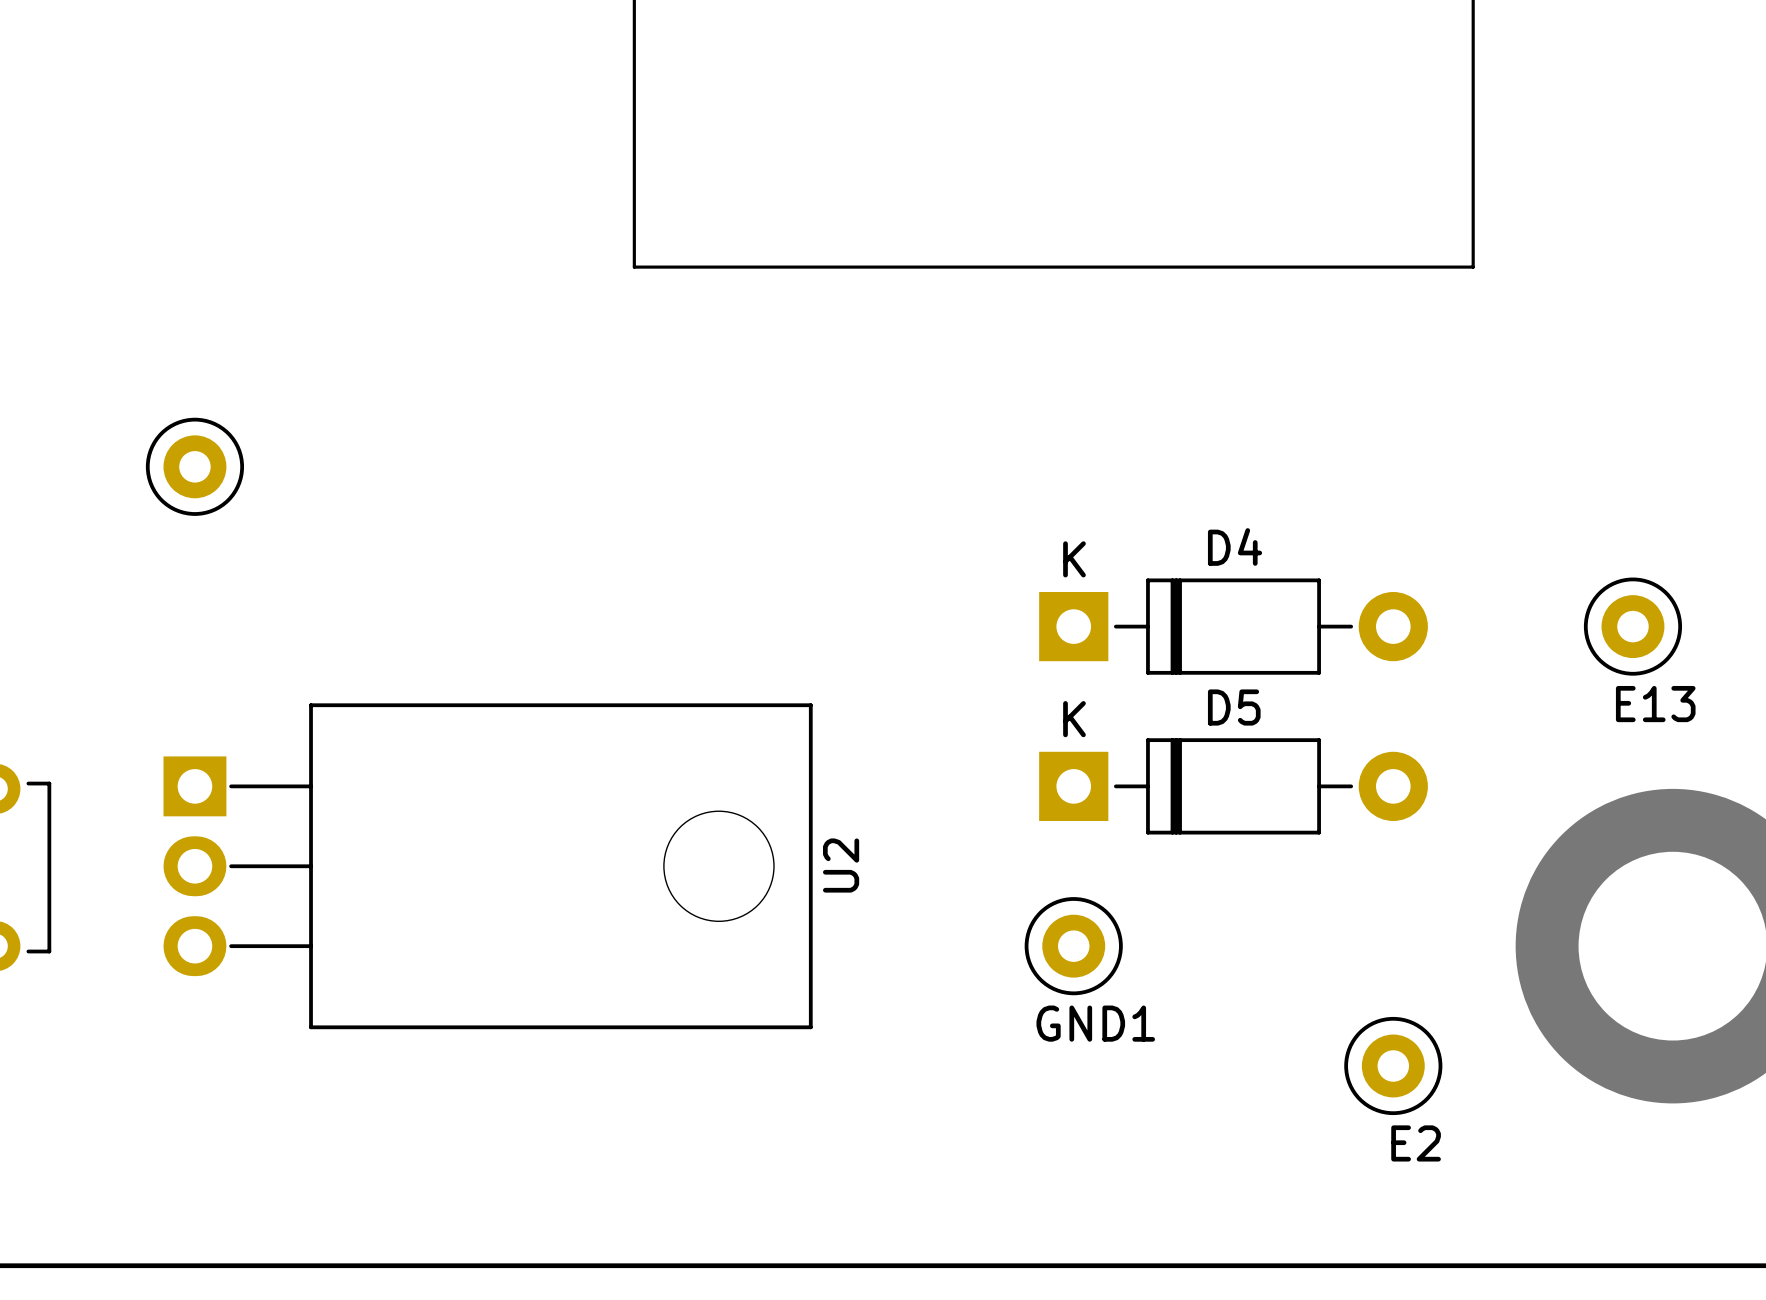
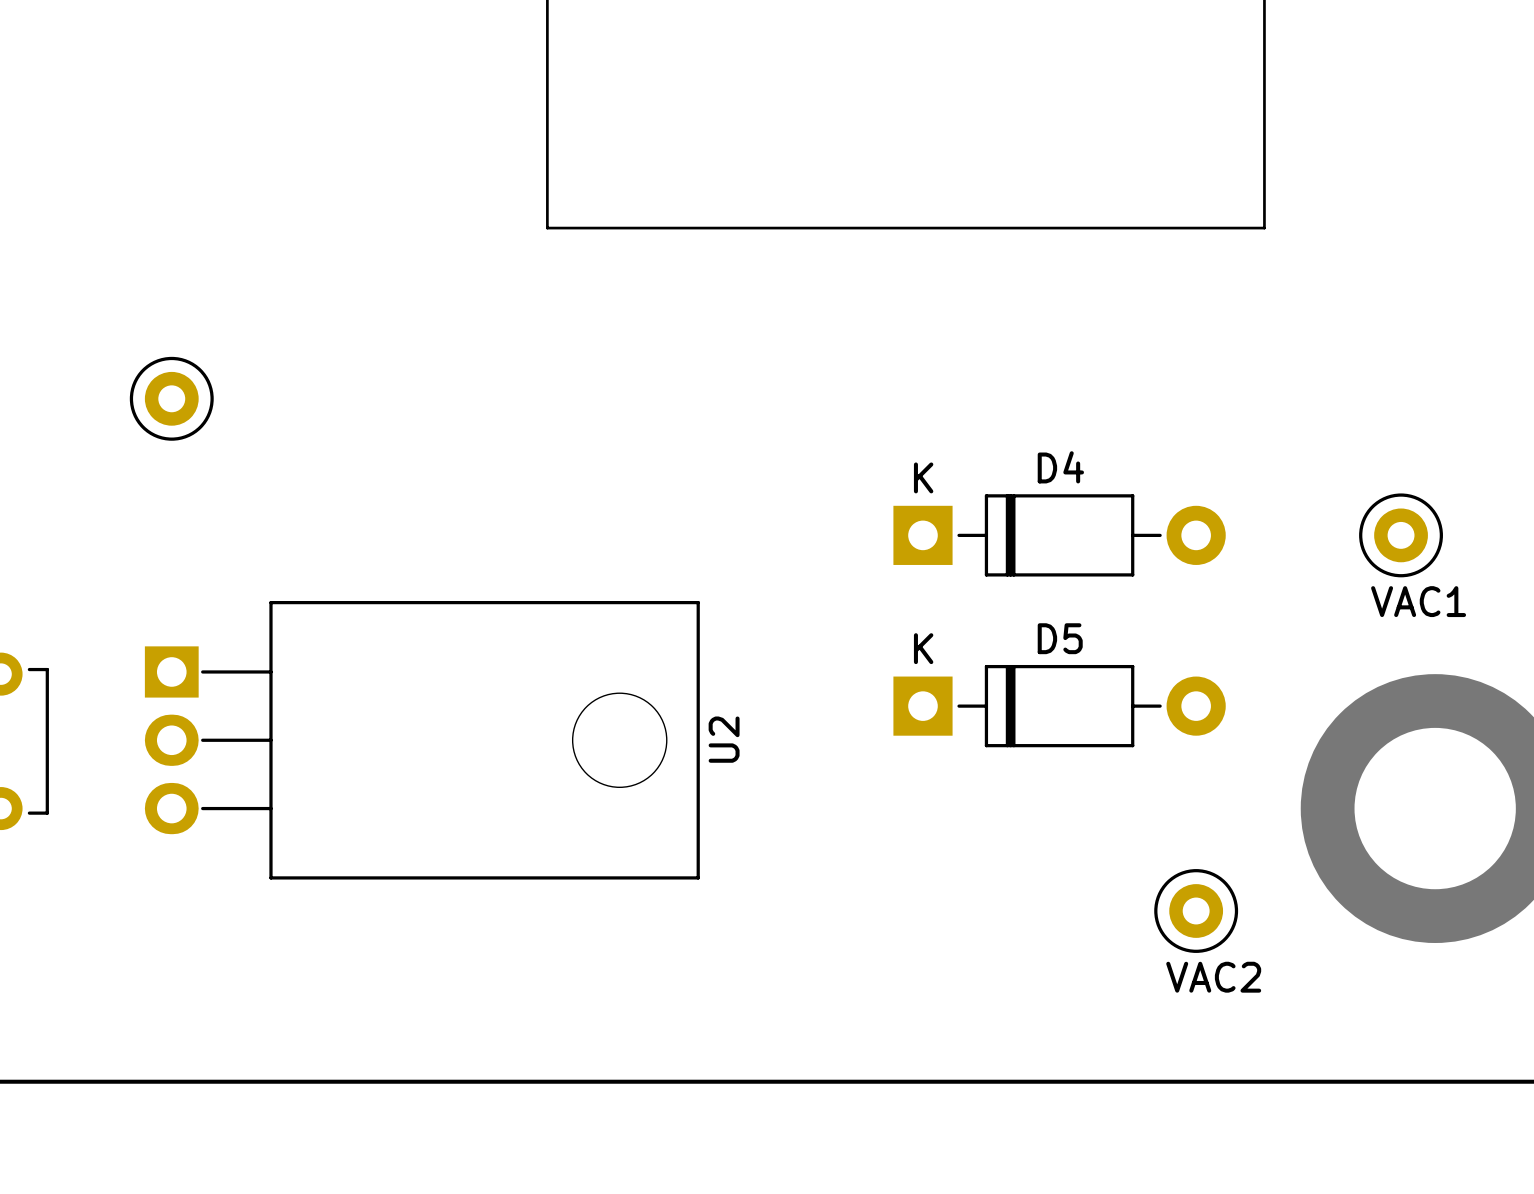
E13 name: E13 (1655, 704) -> VAC1 (1418, 601)
D5 position: (1233, 786) -> (1059, 706)
GND1: (1073, 946) -> none
E2 name: E2 (1416, 1143) -> VAC2 (1213, 977)

